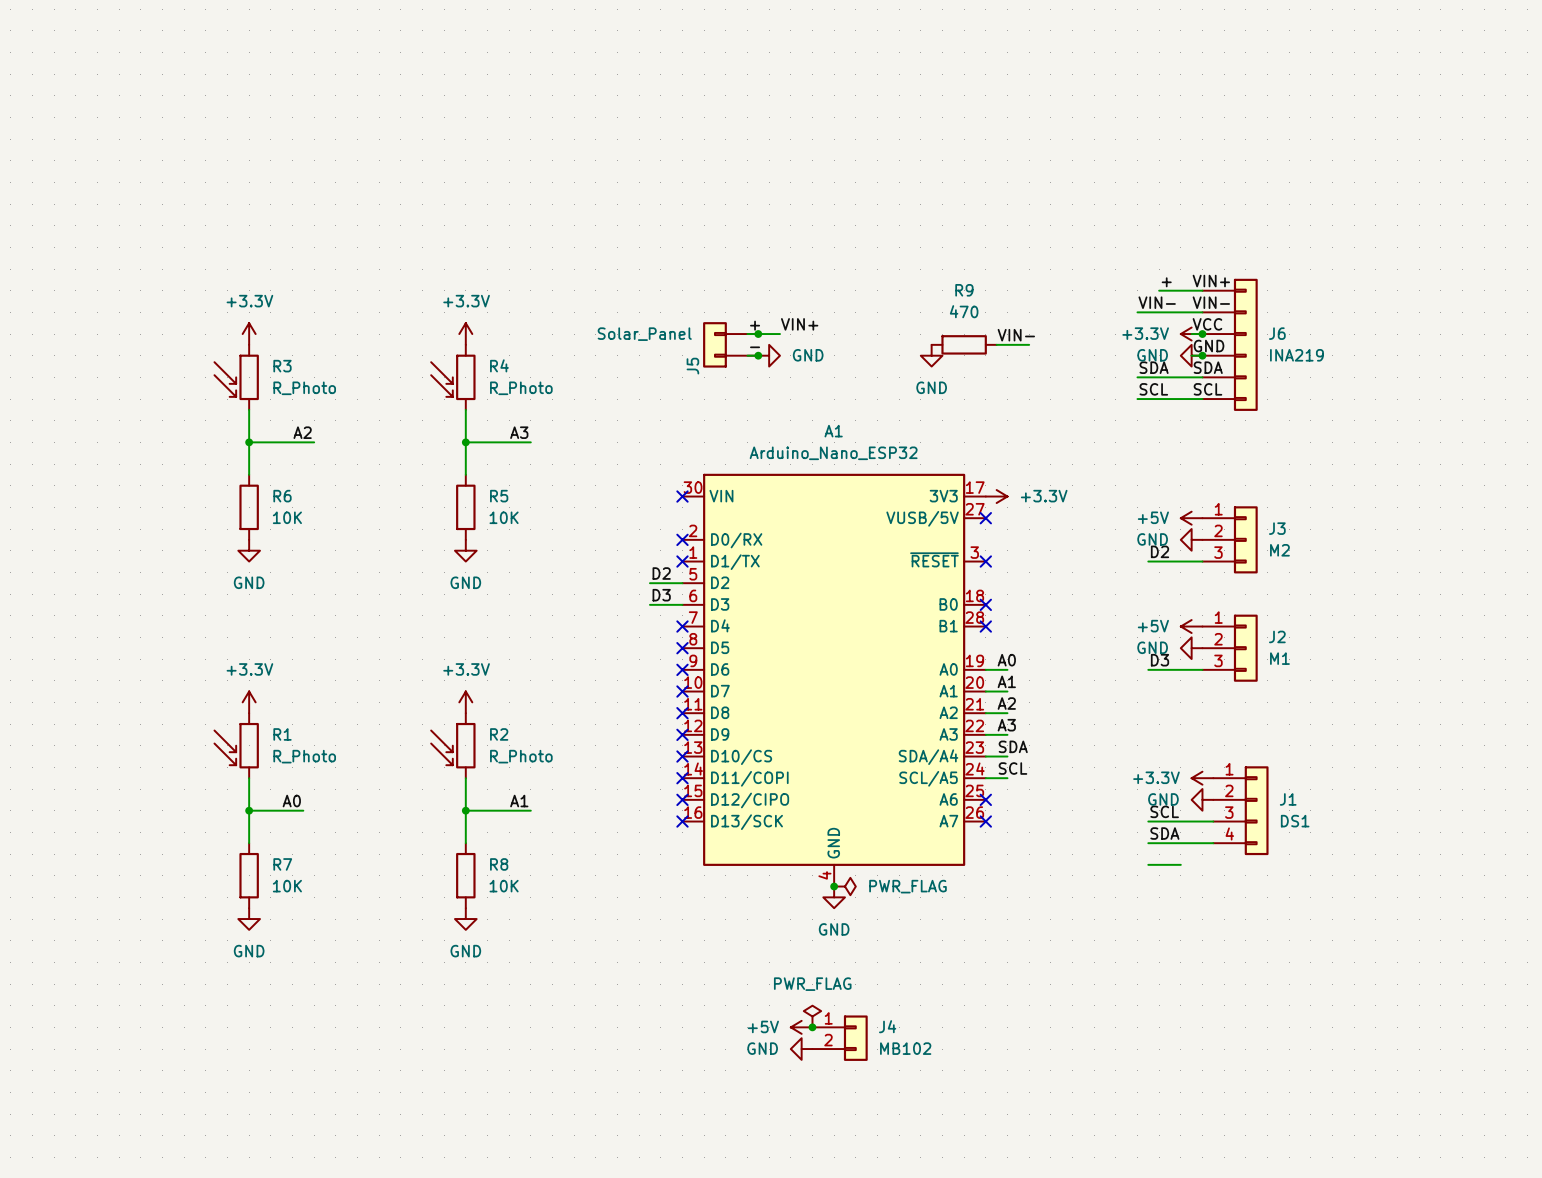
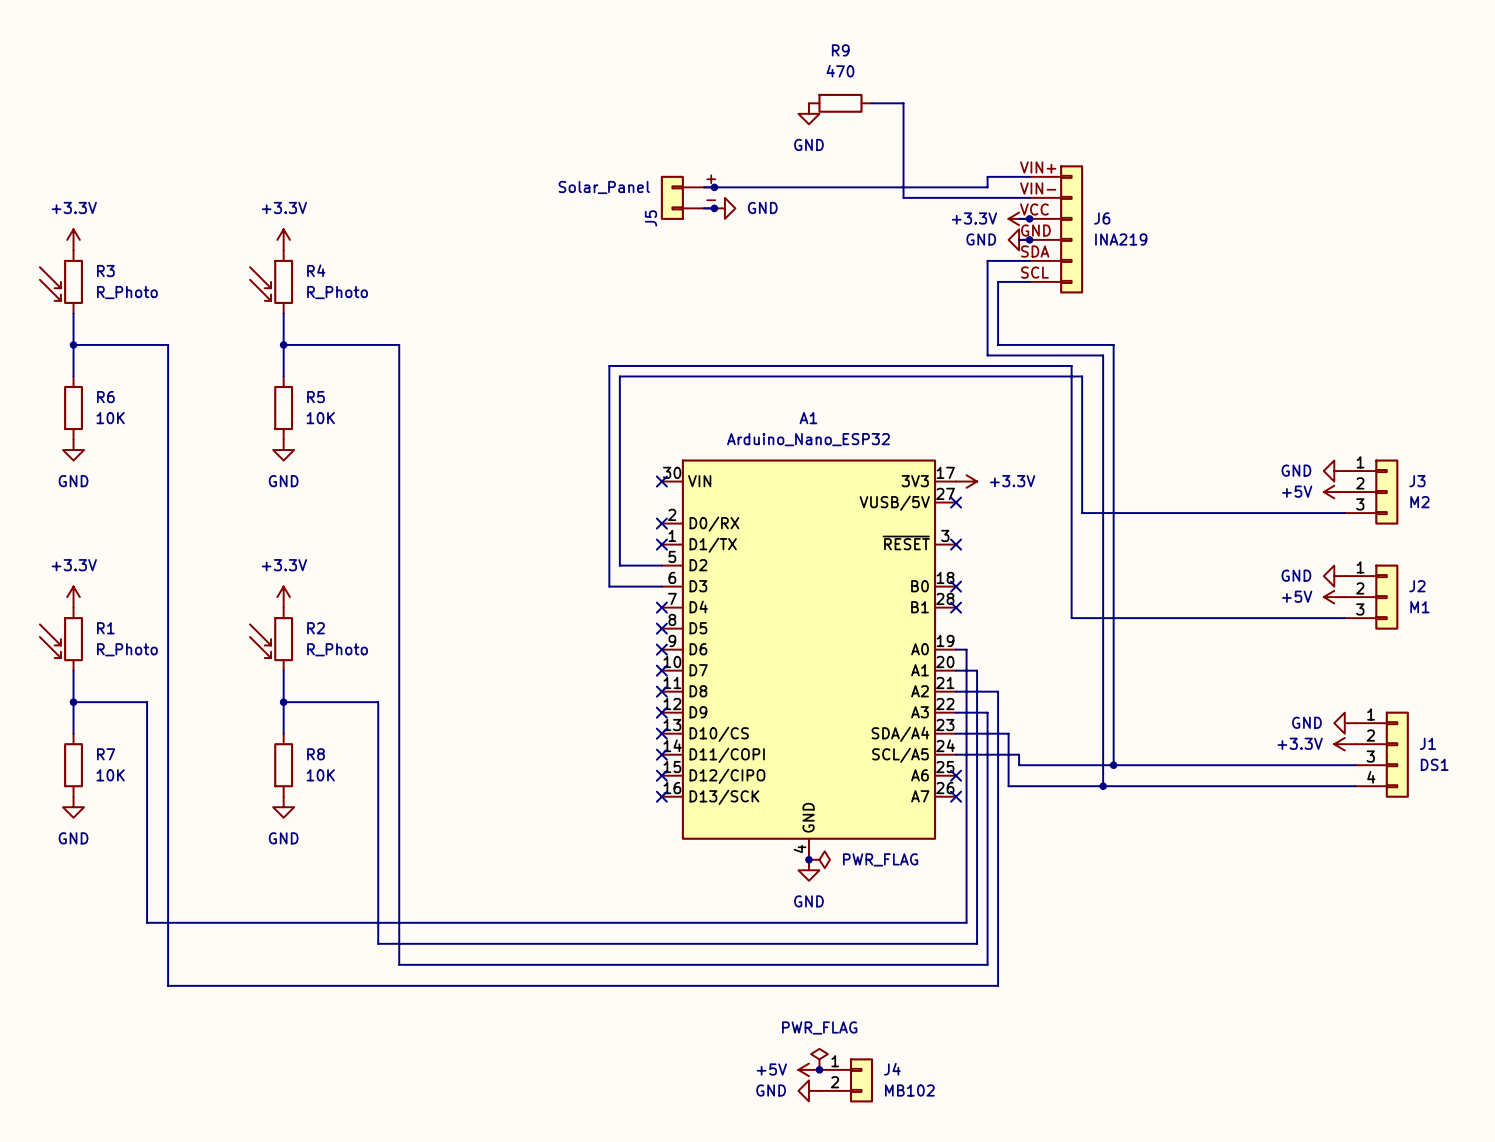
wire: none -> (872, 103) (903, 103) (903, 197) (1029, 197)
power symbol: none -> GND (808, 113)
label: none -> VIN+ (1038, 167)
wire: none -> (1029, 176) (987, 176) (987, 187) (703, 187)
junction: none -> (714, 187)
label: none -> VIN- (1038, 188)
junction: none -> (714, 208)
power symbol: none -> GND (724, 208)
junction: none -> (1029, 218)
power symbol: none -> +3.3V (73, 239)
power symbol: none -> +3.3V (283, 239)
power symbol: none -> GND (1019, 239)
junction: none -> (1029, 239)
label: none -> SDA (1035, 251)
wire: none -> (1029, 260) (987, 260) (987, 355) (1103, 355) (1103, 786)
label: none -> SCL (1034, 272)
label: VIN+ (1211, 281) -> none
label: + (1166, 282) -> none
wire: none -> (1029, 281) (998, 281) (998, 344) (1113, 344) (1113, 765)
wire: (1159, 290) (1202, 290) -> none
label: VIN- (1157, 302) -> none
label: VIN- (1211, 302) -> none
wire: (1137, 312) (1202, 312) -> none
label: VIN+ (799, 324) -> none
label position: VCC (1207, 324) -> VCC (1034, 209)
label position: + (755, 325) -> + (711, 179)
power symbol: +3.3V (249, 334) -> none
power symbol: +3.3V (465, 334) -> none
wire: (747, 334) (779, 334) -> none
junction: (758, 334) -> none
wire: (1191, 334) (1202, 334) -> (1019, 218) (1029, 218)
power symbol position: +3.3V (1191, 334) -> +3.3V (1019, 218)
junction: (1202, 334) -> none
label: VIN- (1016, 335) -> none
J5 position: (730, 344) -> (687, 197)
R9 position: (964, 344) -> (840, 103)
wire: (996, 344) (1029, 344) -> none
J6 position: (1230, 344) -> (1056, 229)
label position: GND (1209, 346) -> GND (1035, 230)
label position: - (755, 347) -> - (711, 200)
wire: none -> (73, 344) (168, 344) (168, 985) (998, 985) (998, 691) (977, 691)
junction: none -> (73, 344)
wire: none -> (283, 344) (399, 344) (399, 964) (987, 964) (987, 712) (977, 712)
junction: none -> (283, 344)
wire: (747, 355) (758, 355) -> (703, 208) (714, 208)
junction: (758, 355) -> none
power symbol: GND (769, 355) -> none
power symbol: GND (931, 355) -> none
wire: (1191, 355) (1202, 355) -> (1019, 239) (1029, 239)
power symbol: GND (1191, 355) -> none
junction: (1202, 355) -> none
label: SDA (1154, 367) -> none
label: SDA (1208, 367) -> none
R3 position: (236, 377) -> (61, 281)
R4 position: (453, 377) -> (271, 281)
wire: (1137, 377) (1202, 377) -> none
label: SCL (1153, 389) -> none
label: SCL (1207, 389) -> none
wire: (1137, 399) (1202, 399) -> none
wire: (249, 409) (249, 474) -> (73, 313) (73, 376)
wire: (465, 409) (465, 474) -> (283, 313) (283, 376)
label: A2 (302, 432) -> none
label: A3 (519, 432) -> none
wire: (249, 442) (314, 442) -> none
junction: (249, 442) -> none
wire: (465, 442) (530, 442) -> none
junction: (465, 442) -> none
power symbol: none -> GND (73, 450)
power symbol: none -> GND (283, 450)
power symbol: none -> GND (1334, 471)
R6 position: (249, 507) -> (73, 407)
R5 position: (465, 507) -> (283, 407)
power symbol: none -> +5V (1334, 492)
power symbol: +5V (1191, 518) -> none
wire: none -> (1344, 513) (1082, 513) (1082, 376) (619, 376) (619, 565) (630, 565)
power symbol: GND (1191, 539) -> none
J3 position: (1230, 539) -> (1371, 492)
power symbol: GND (249, 550) -> none
power symbol: GND (465, 550) -> none
label: D2 (1160, 551) -> none
wire: (1148, 561) (1202, 561) -> none
label: D2 (661, 573) -> none
power symbol: none -> GND (1334, 576)
label: D3 (661, 595) -> none
wire: none -> (630, 586) (609, 586) (609, 365) (1071, 365) (1071, 618) (1344, 618)
power symbol: none -> +3.3V (73, 597)
power symbol: none -> +3.3V (283, 597)
power symbol: none -> +5V (1334, 597)
power symbol: +5V (1191, 626) -> none
power symbol: GND (1191, 648) -> none
J2 position: (1230, 648) -> (1371, 597)
label: A0 (1006, 660) -> none
label: D3 (1160, 660) -> none
wire: (996, 669) (1007, 669) -> (966, 649) (966, 922) (147, 922) (147, 702) (73, 702)
wire: (1148, 669) (1202, 669) -> none
label: A1 (1006, 681) -> none
wire: none -> (977, 670) (977, 943) (378, 943) (378, 702) (283, 702)
power symbol: +3.3V (249, 702) -> none
power symbol: +3.3V (465, 702) -> none
label: A2 (1006, 703) -> none
junction: none -> (73, 702)
junction: none -> (283, 702)
label: A3 (1006, 725) -> none
R1 position: (236, 745) -> (61, 639)
R2 position: (453, 745) -> (271, 639)
power symbol: none -> GND (1344, 723)
label: SDA (1013, 746) -> none
wire: none -> (977, 733) (1008, 733) (1008, 786) (1355, 786)
label: SCL (1012, 768) -> none
wire: (249, 778) (249, 843) -> (73, 670) (73, 733)
wire: (465, 778) (465, 843) -> (283, 670) (283, 733)
wire: none -> (977, 754) (1019, 754) (1019, 765) (1355, 765)
power symbol position: +3.3V (1202, 778) -> +3.3V (1344, 744)
junction: none -> (1113, 765)
power symbol: GND (1202, 799) -> none
label: A0 (291, 801) -> none
label: A1 (519, 801) -> none
wire: (249, 810) (303, 810) -> none
junction: (249, 810) -> none
wire: (465, 810) (530, 810) -> none
junction: (465, 810) -> none
junction: none -> (1103, 786)
J1 position: (1240, 810) -> (1382, 754)
label: SCL (1164, 811) -> none
wire: (1148, 821) (1213, 821) -> none
power symbol: none -> GND (73, 807)
power symbol: none -> GND (283, 807)
label: SDA (1164, 833) -> none
wire: (1148, 843) (1213, 843) -> none
wire: (1148, 864) (1180, 864) -> none
R7 position: (249, 875) -> (73, 765)
R8 position: (465, 875) -> (283, 765)
power symbol: GND (249, 919) -> none
power symbol: GND (465, 919) -> none
power symbol position: PWR_FLAG (812, 1016) -> PWR_FLAG (819, 1059)
power symbol position: +5V (801, 1027) -> +5V (808, 1069)
junction: (812, 1027) -> none
J4 position: (840, 1038) -> (846, 1080)
power symbol position: GND (801, 1049) -> GND (808, 1090)
junction: none -> (819, 1069)

